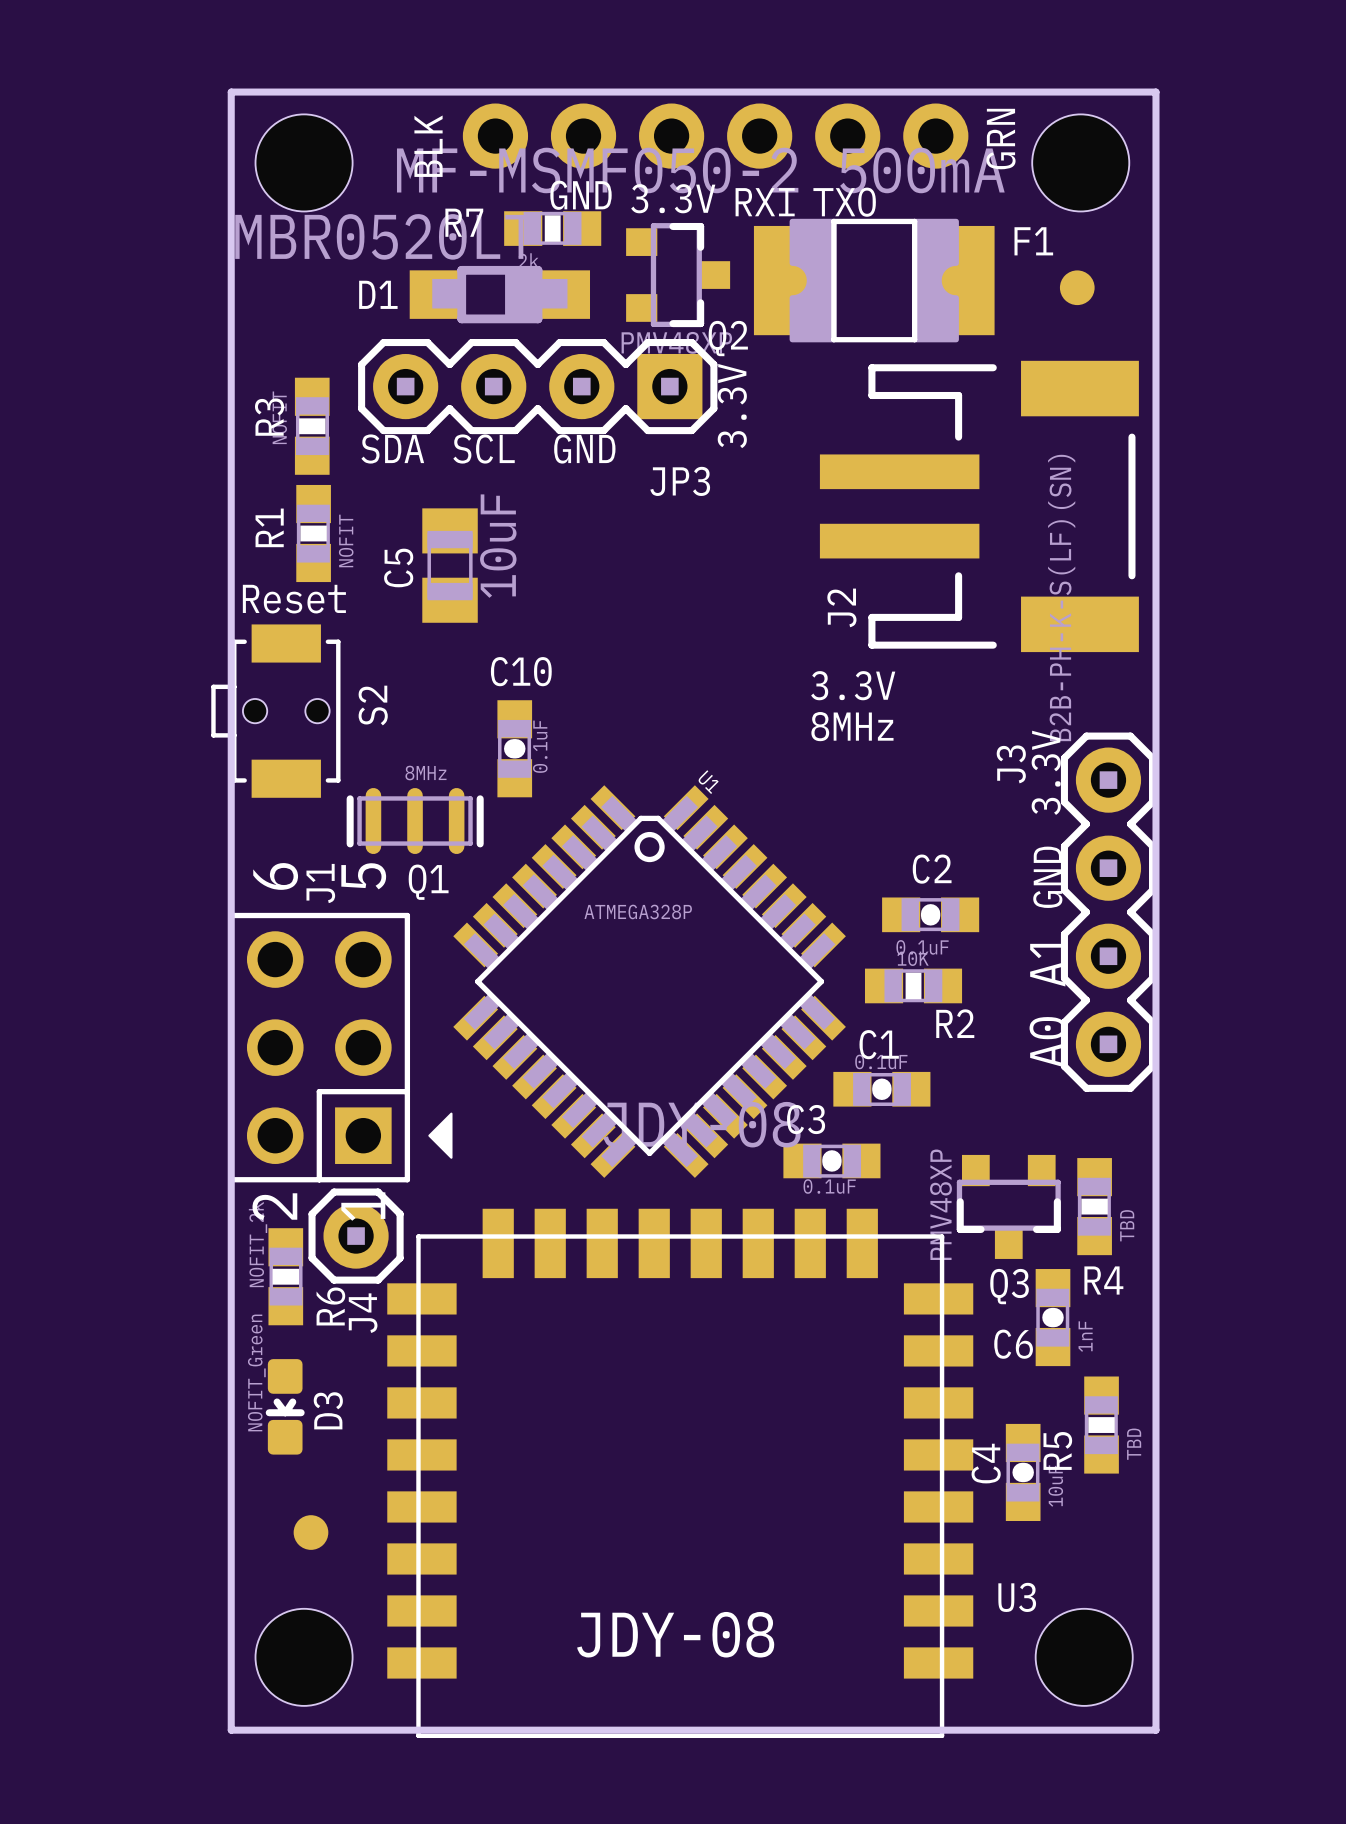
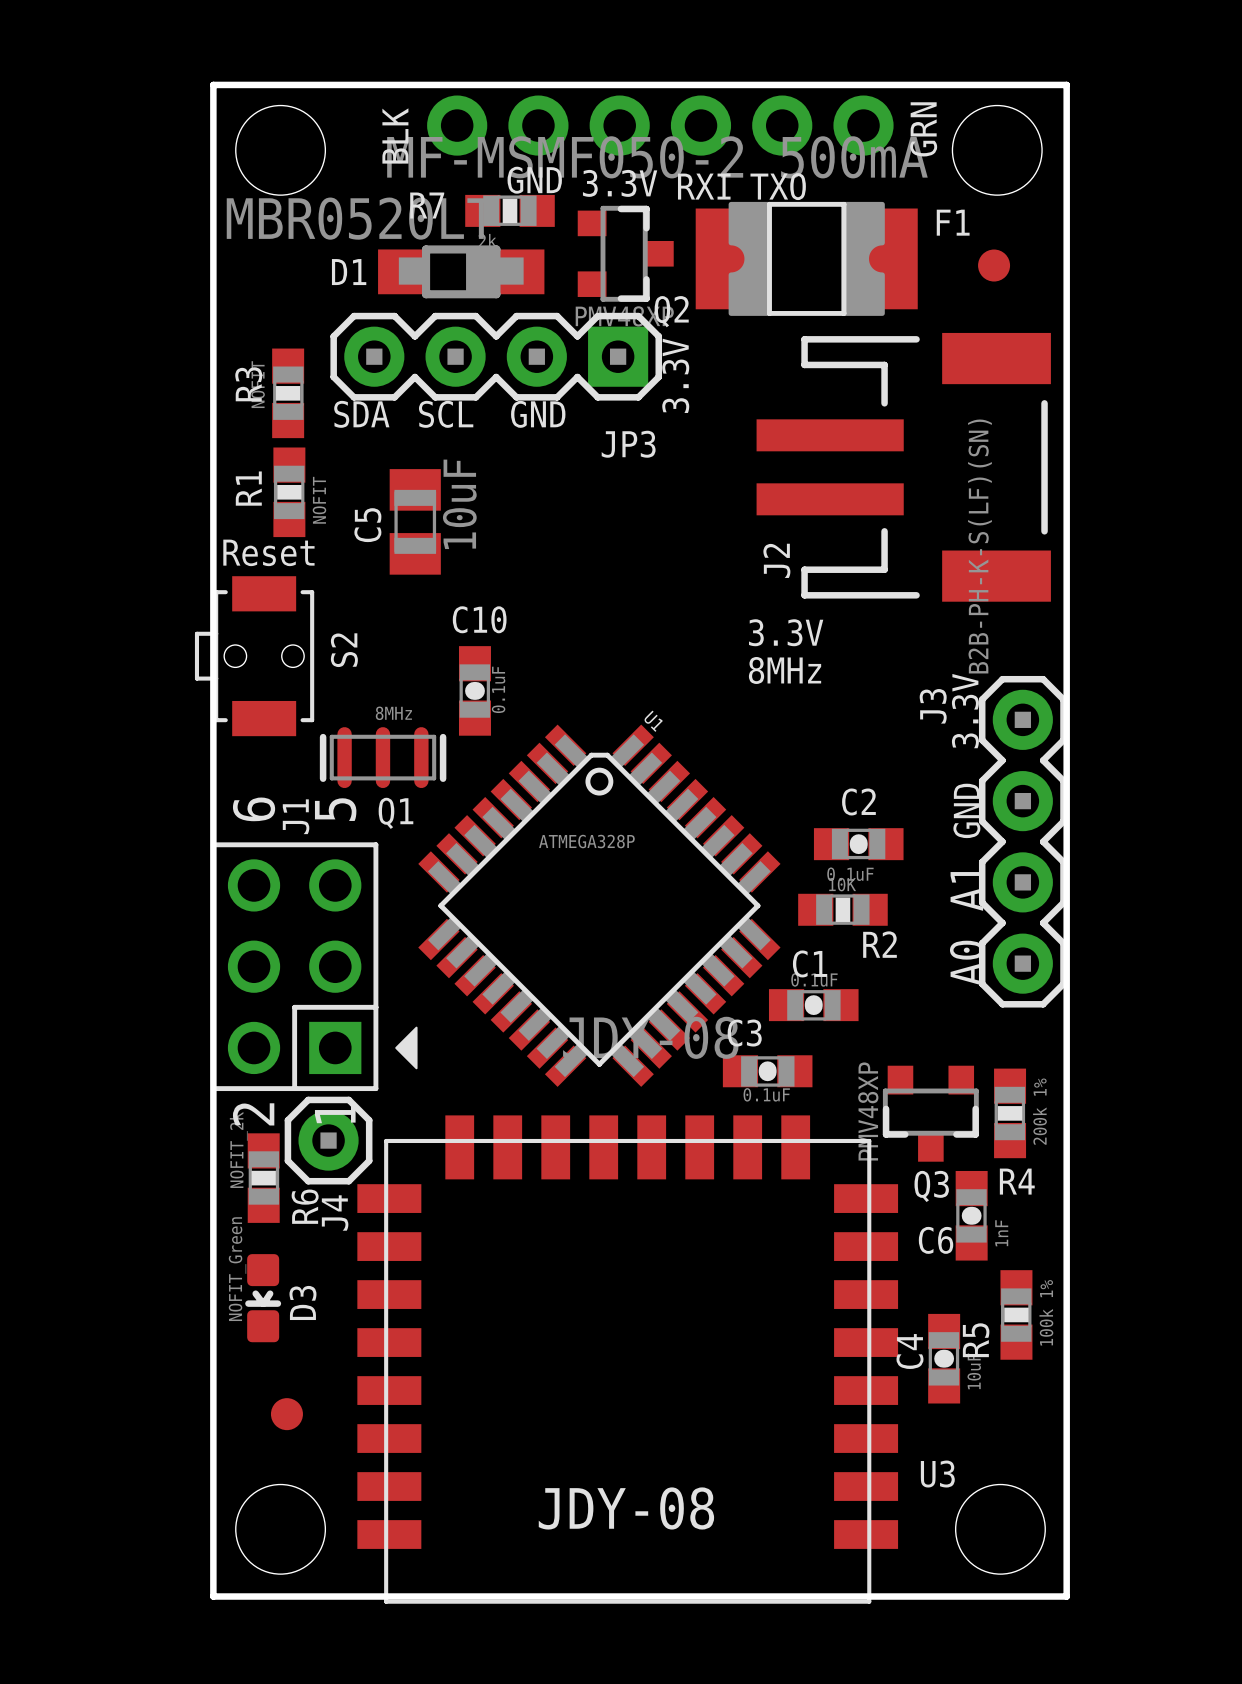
R4 value: TBD (1127, 1225) -> 200k 1% (1039, 1111)
R5 value: TBD (1134, 1444) -> 100k 1% (1046, 1312)

